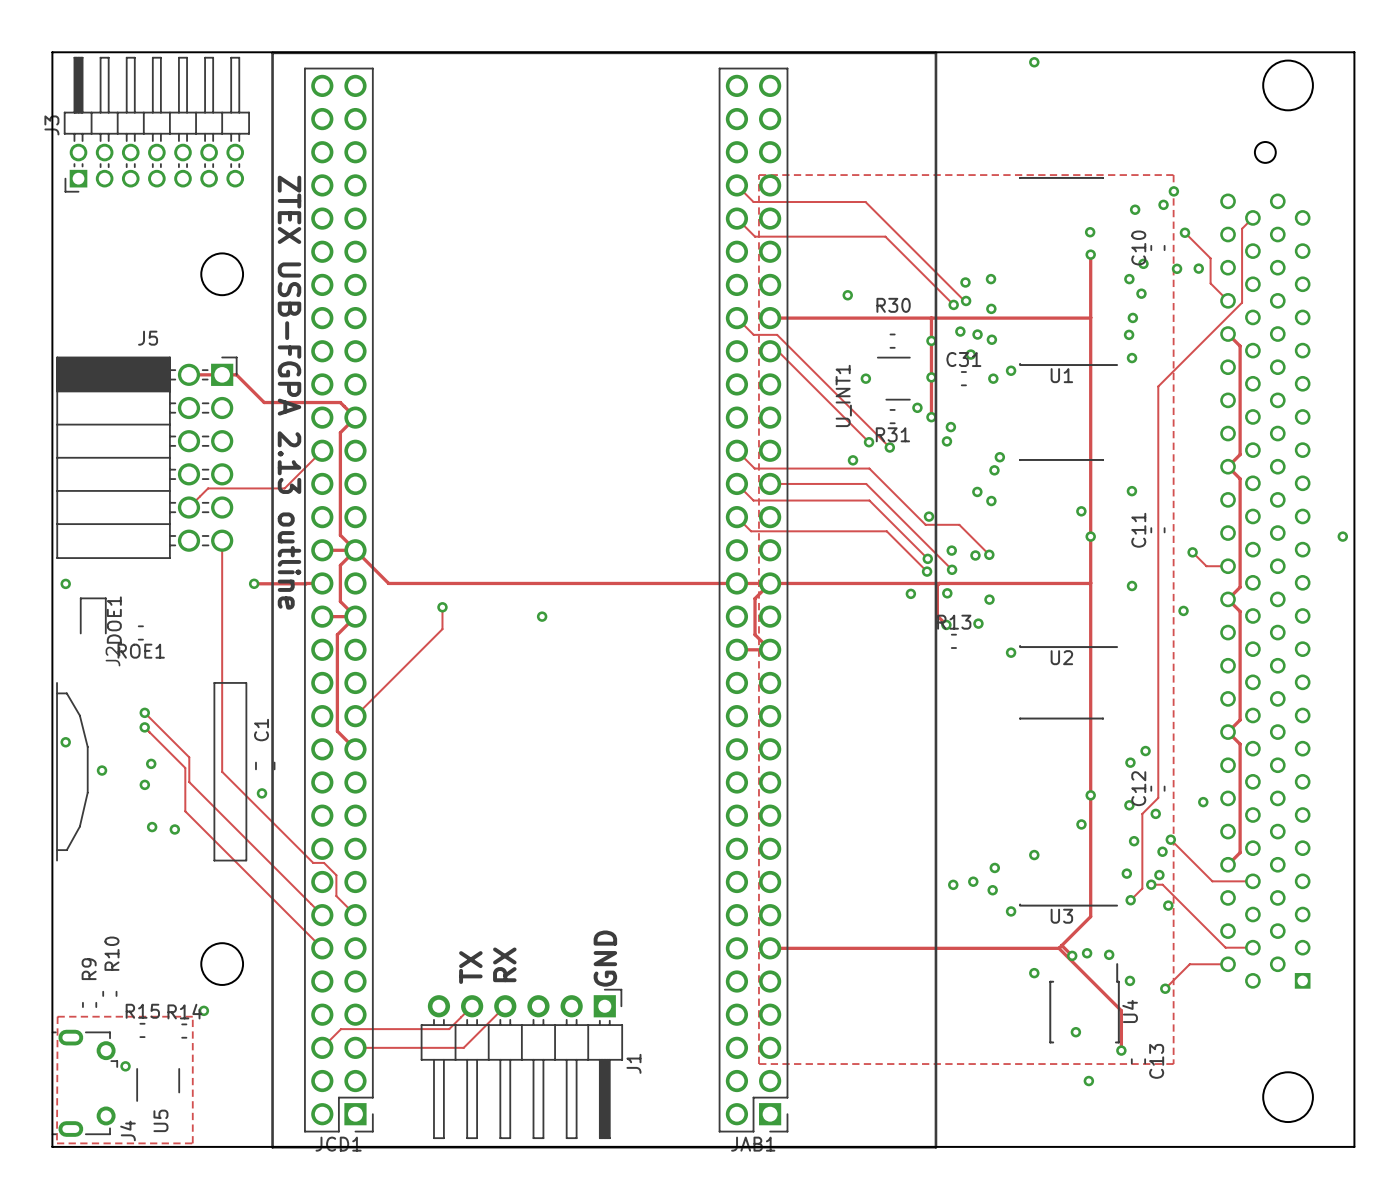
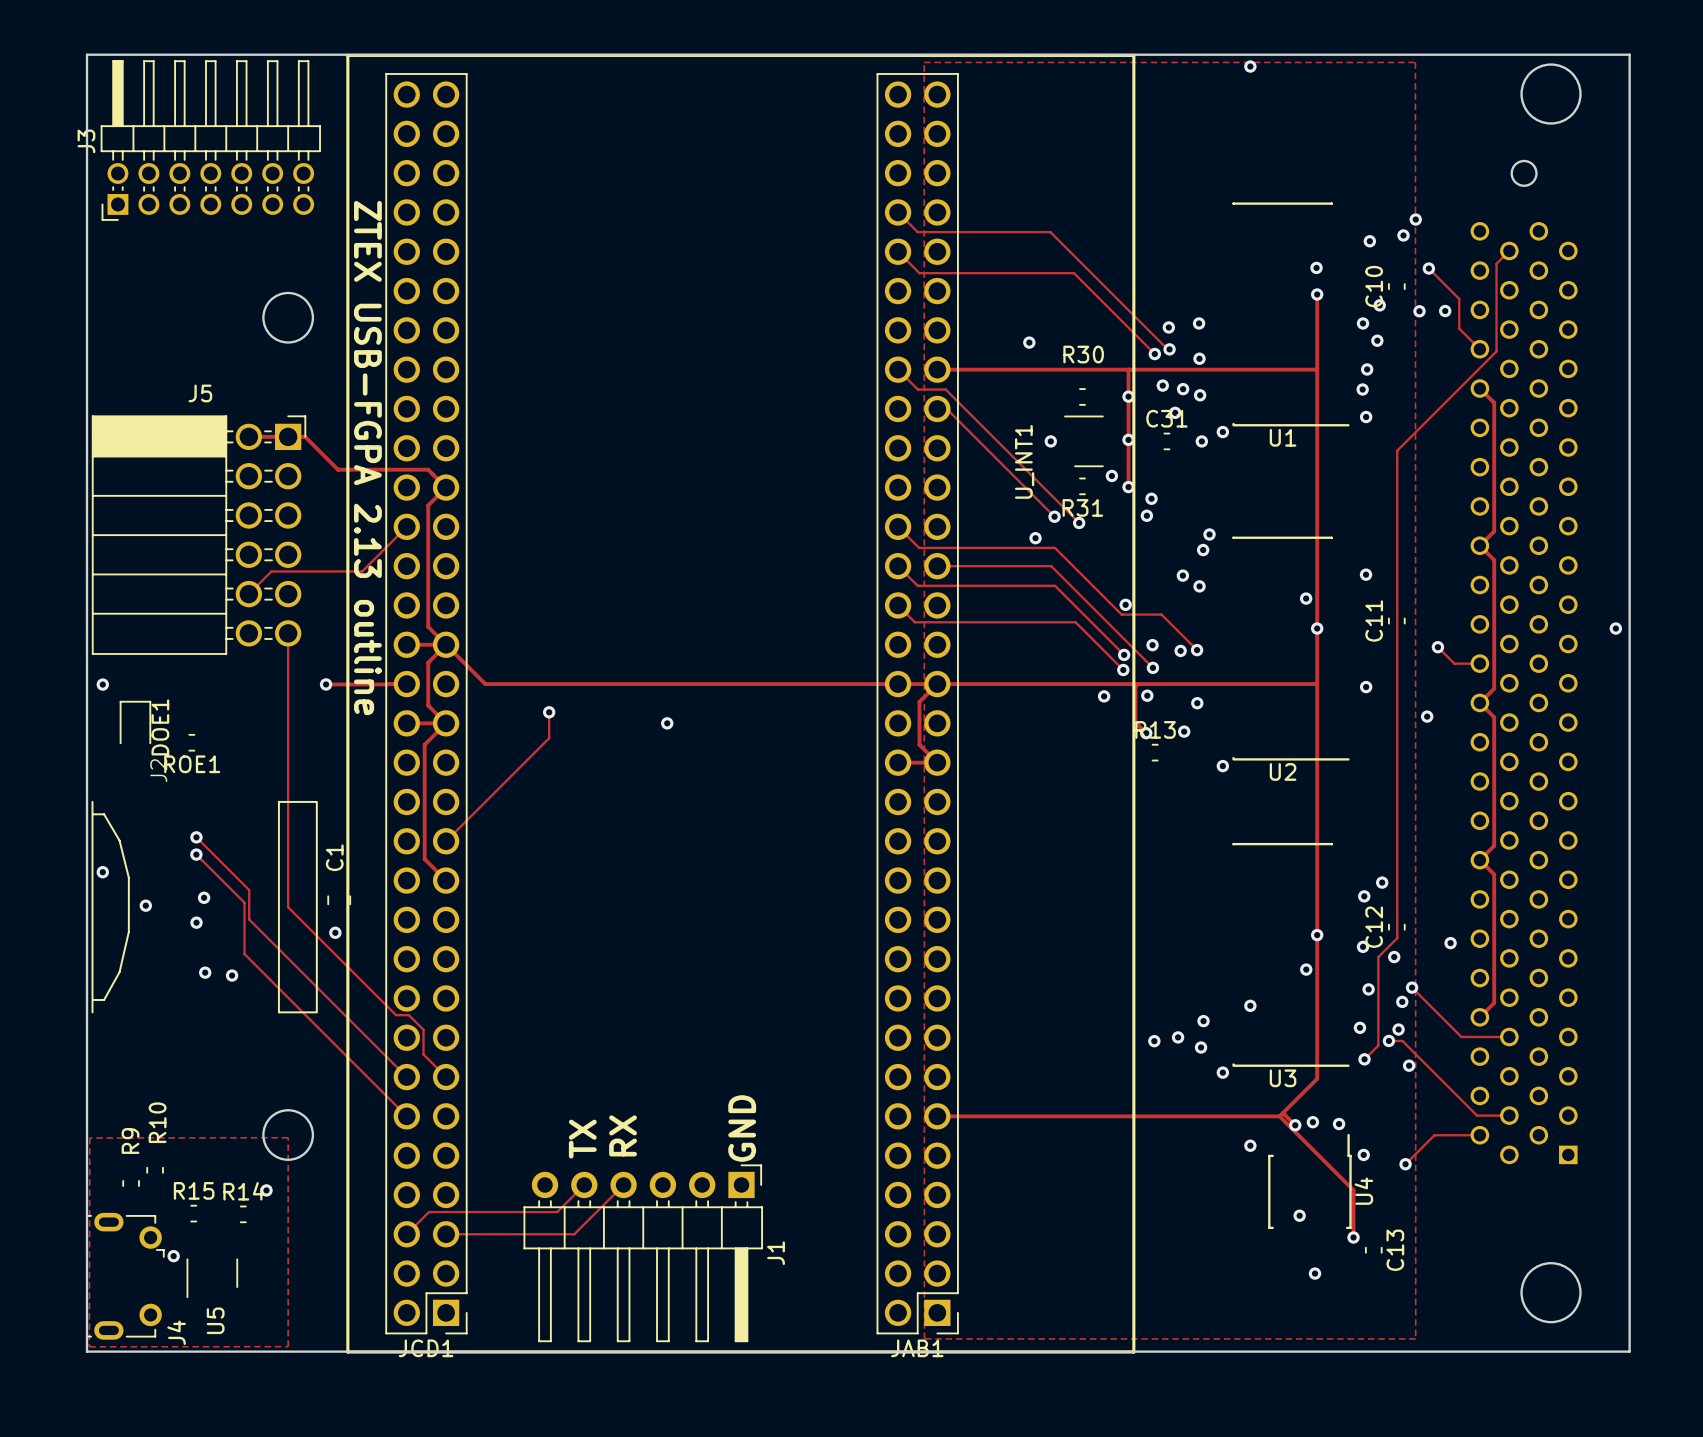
zone outline: (758, 175) (758, 1064) (1173, 1064) (1173, 175) (758, 175) -> (924, 62) (924, 1338) (1415, 1338) (1415, 62) (924, 62)
zone outline: (57, 1016) (192, 1016) (192, 1143) (56, 1143) (57, 1016) -> (288, 1137) (89, 1137) (89, 1346) (288, 1346) (288, 1137)

